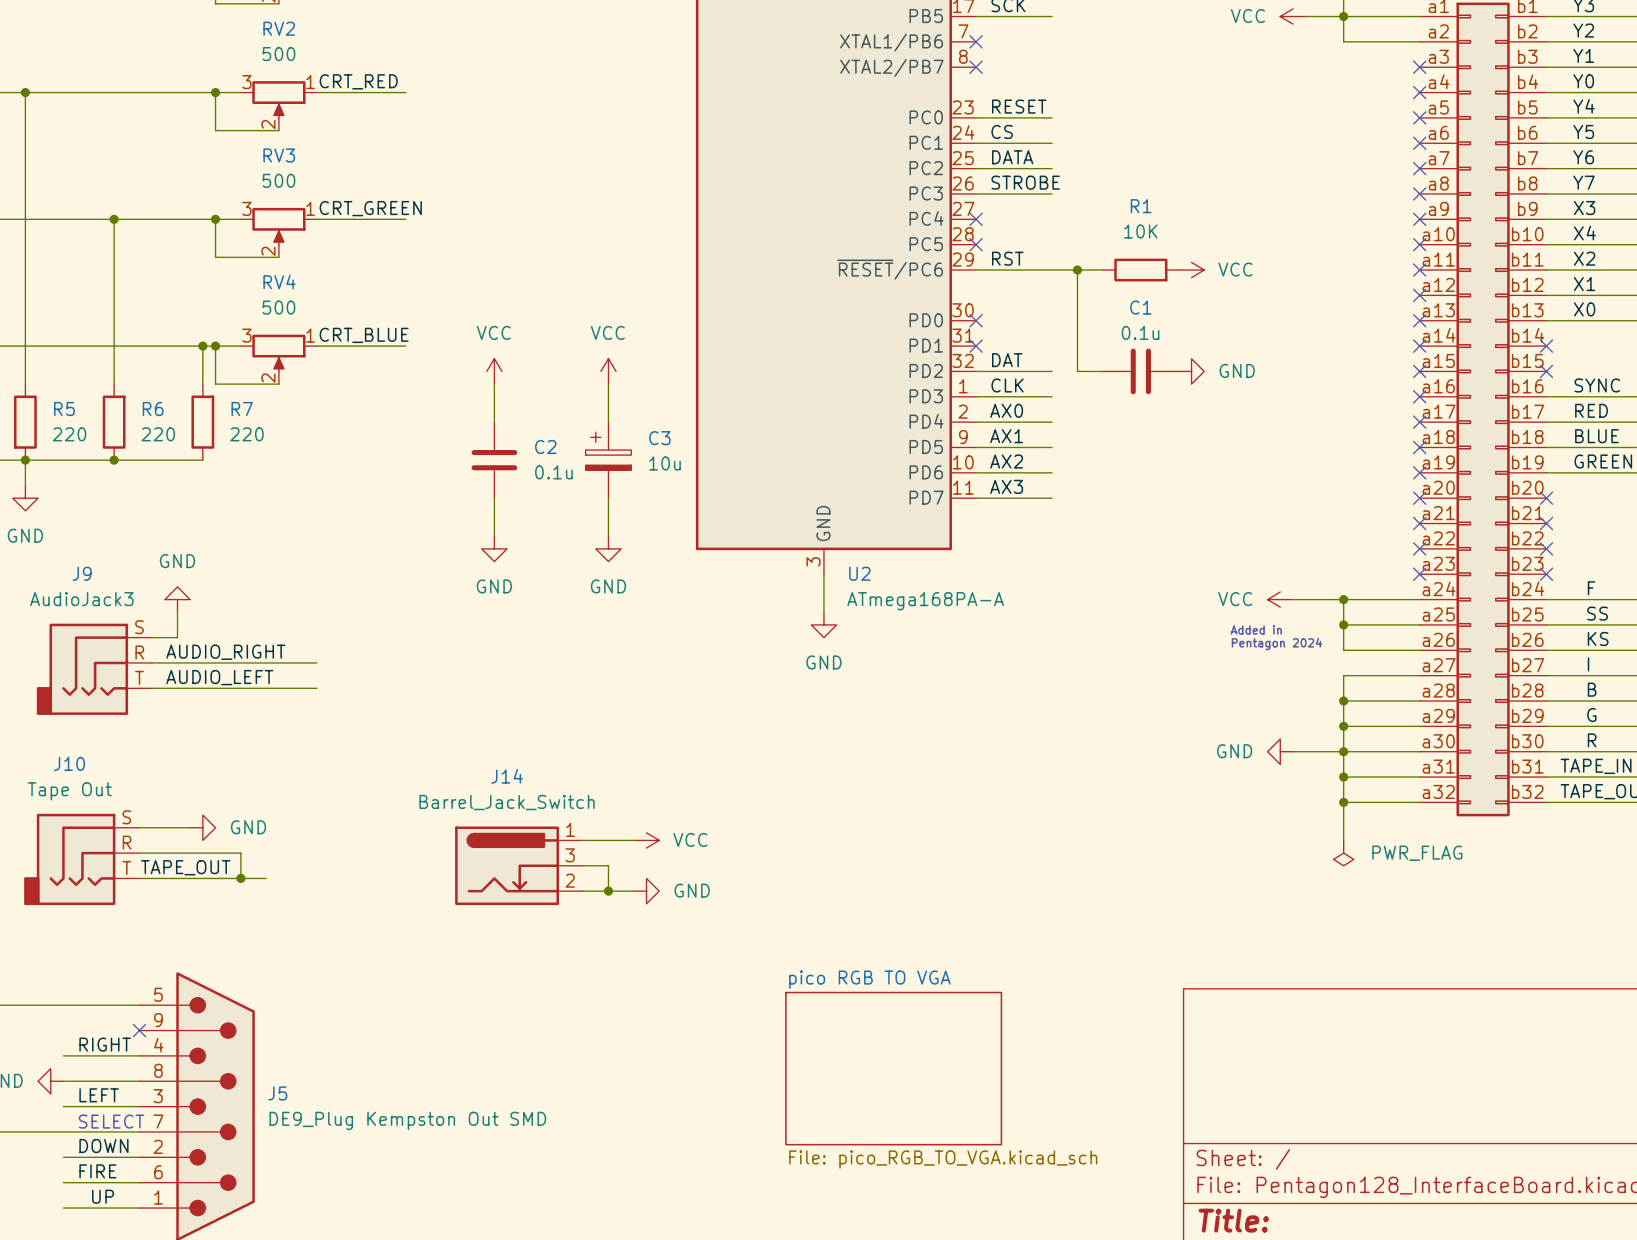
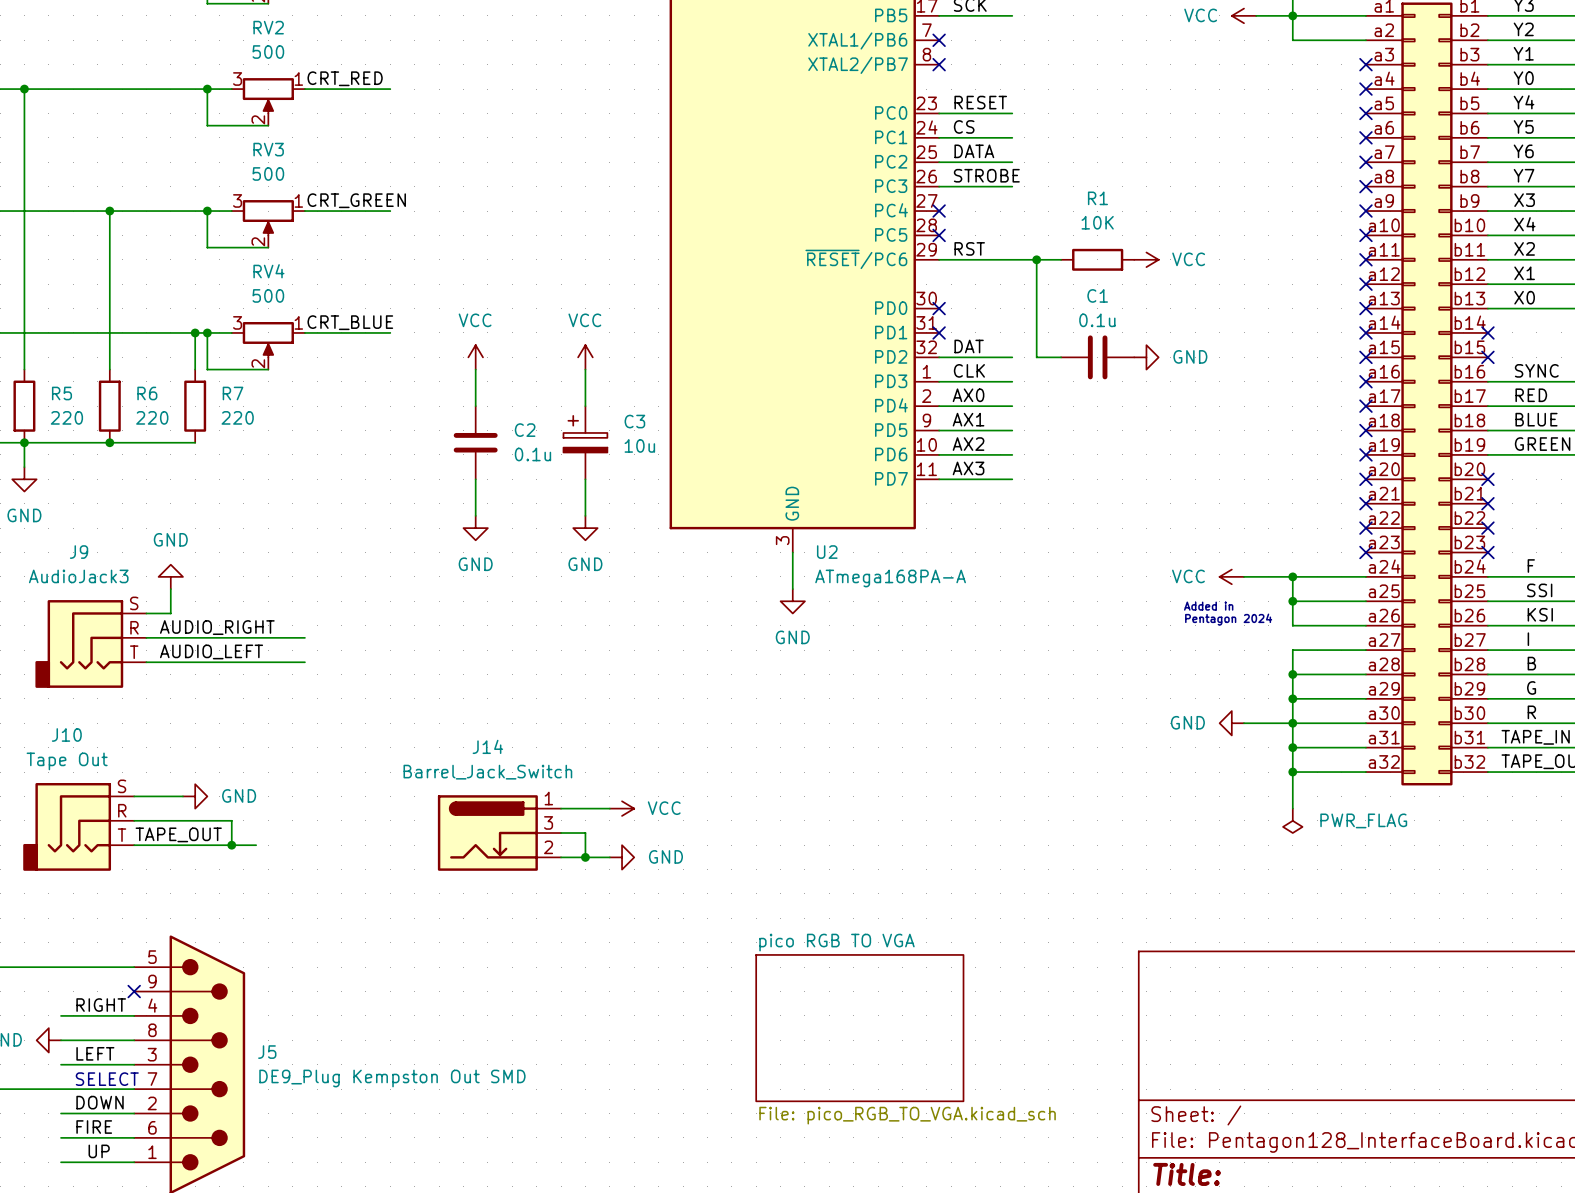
label: SS (1597, 613) -> SSI (1539, 590)
label: KS (1598, 638) -> KSI (1540, 614)

